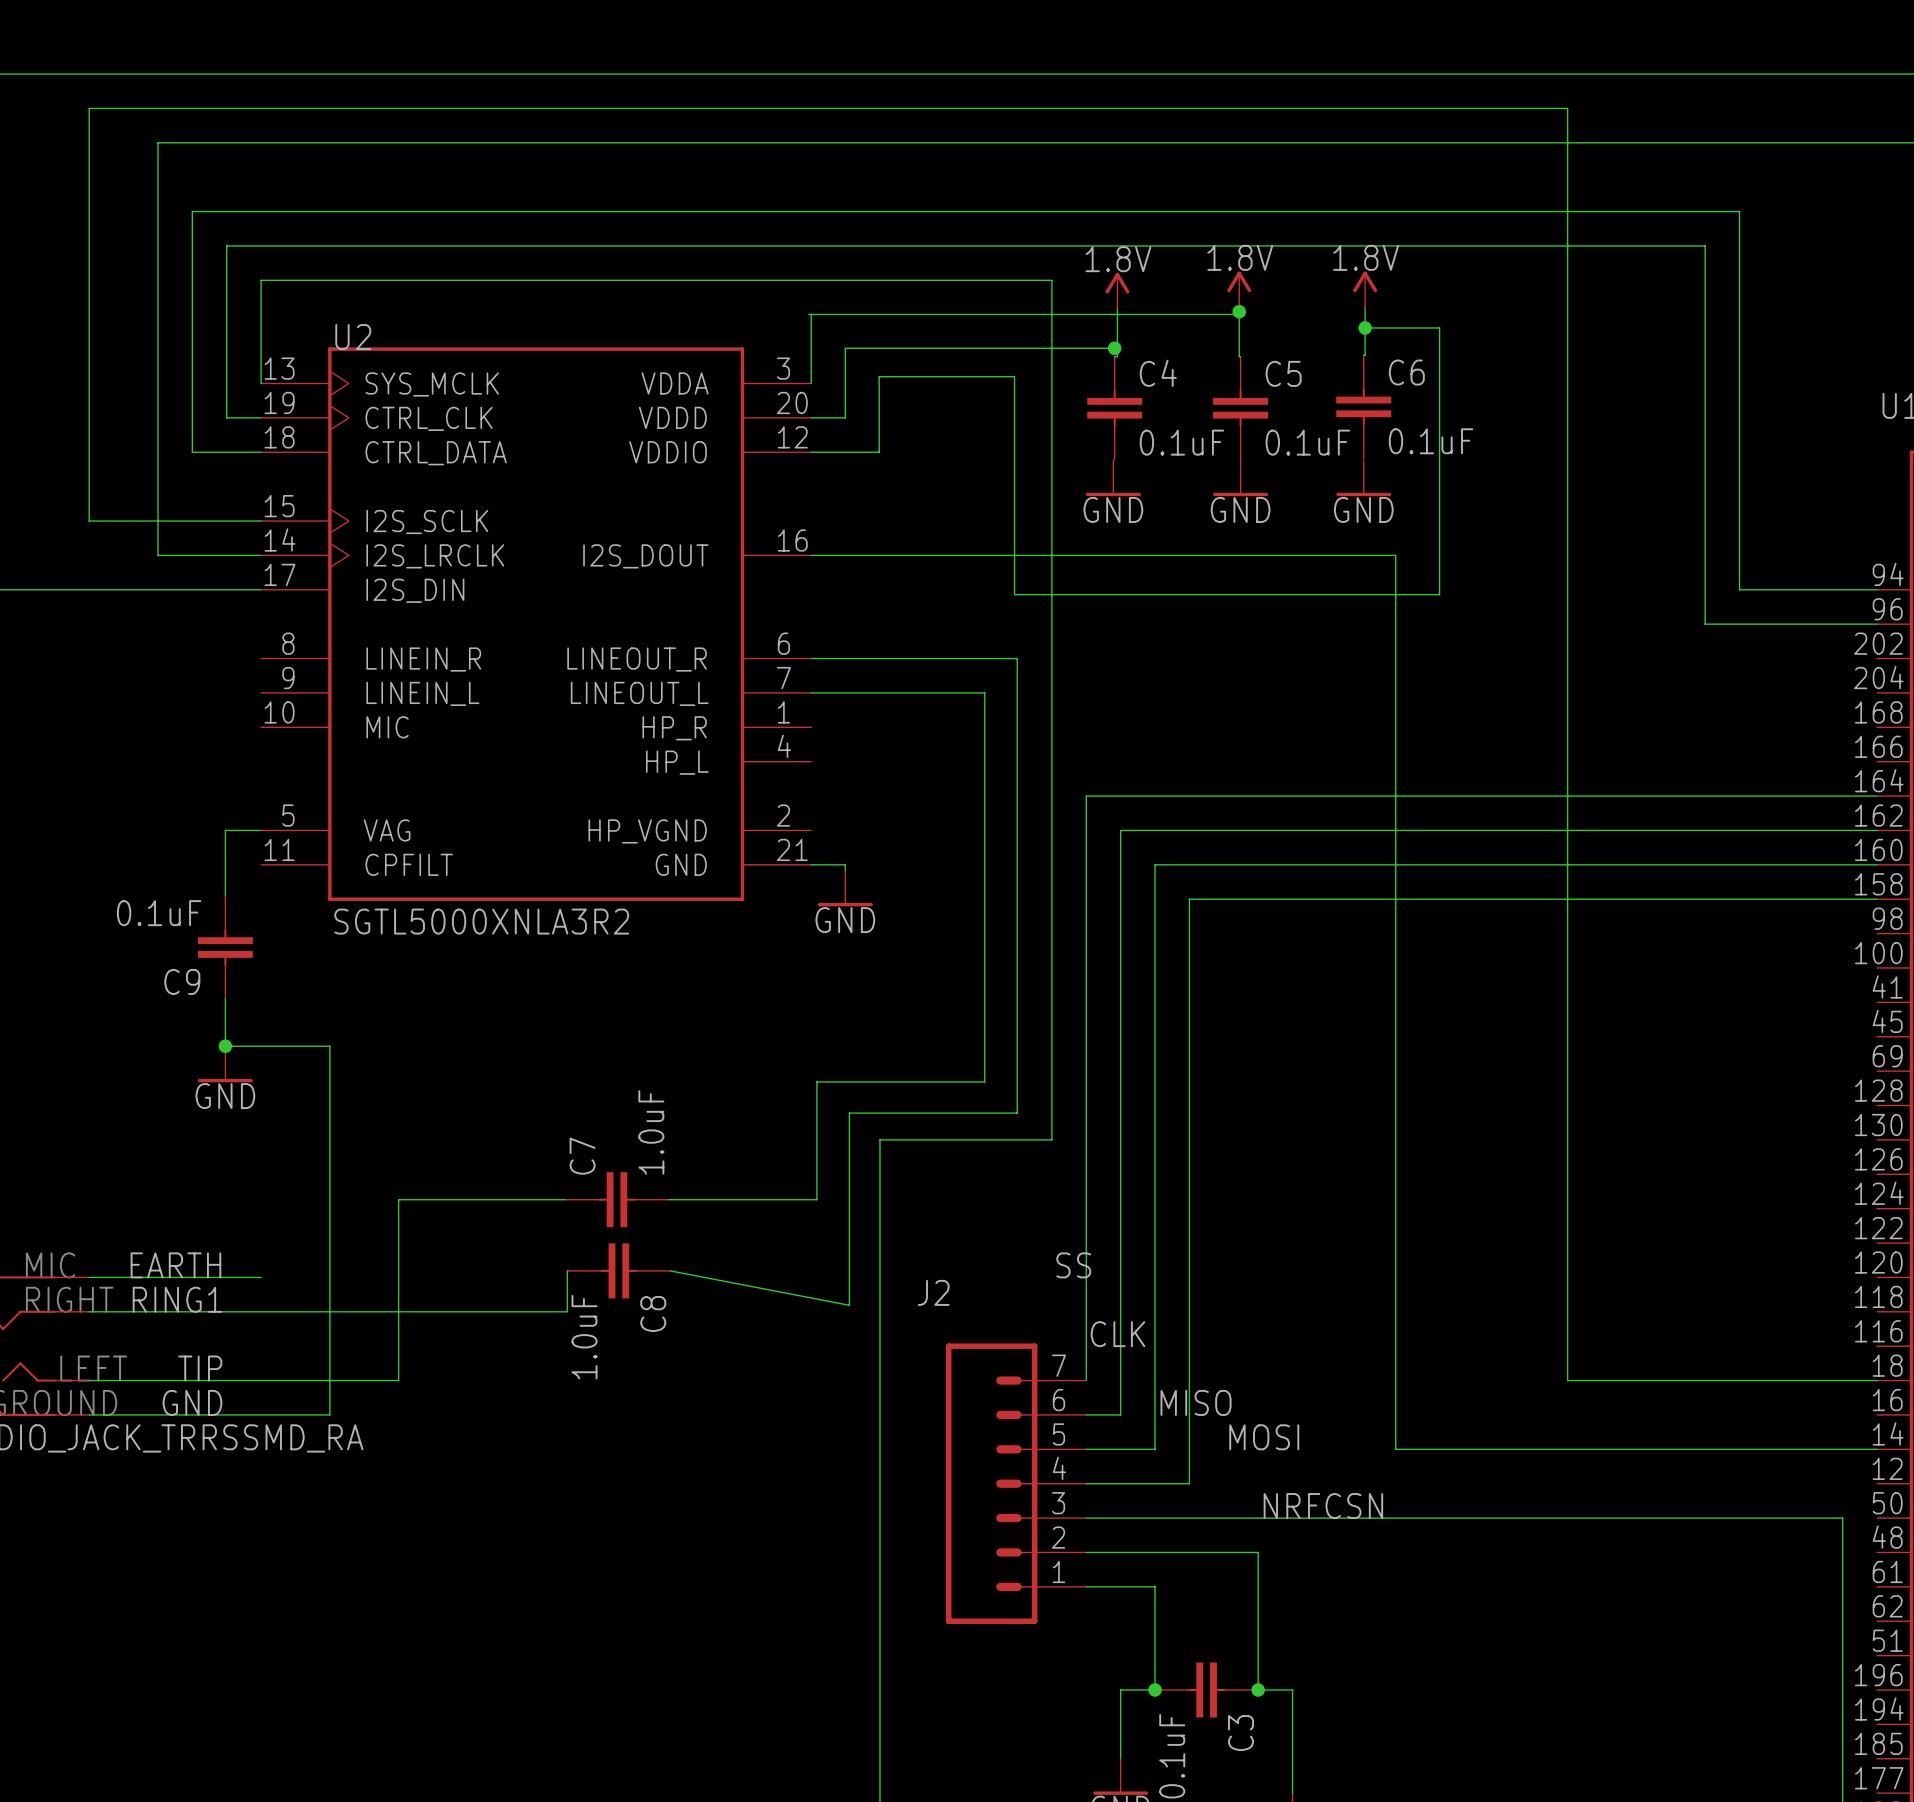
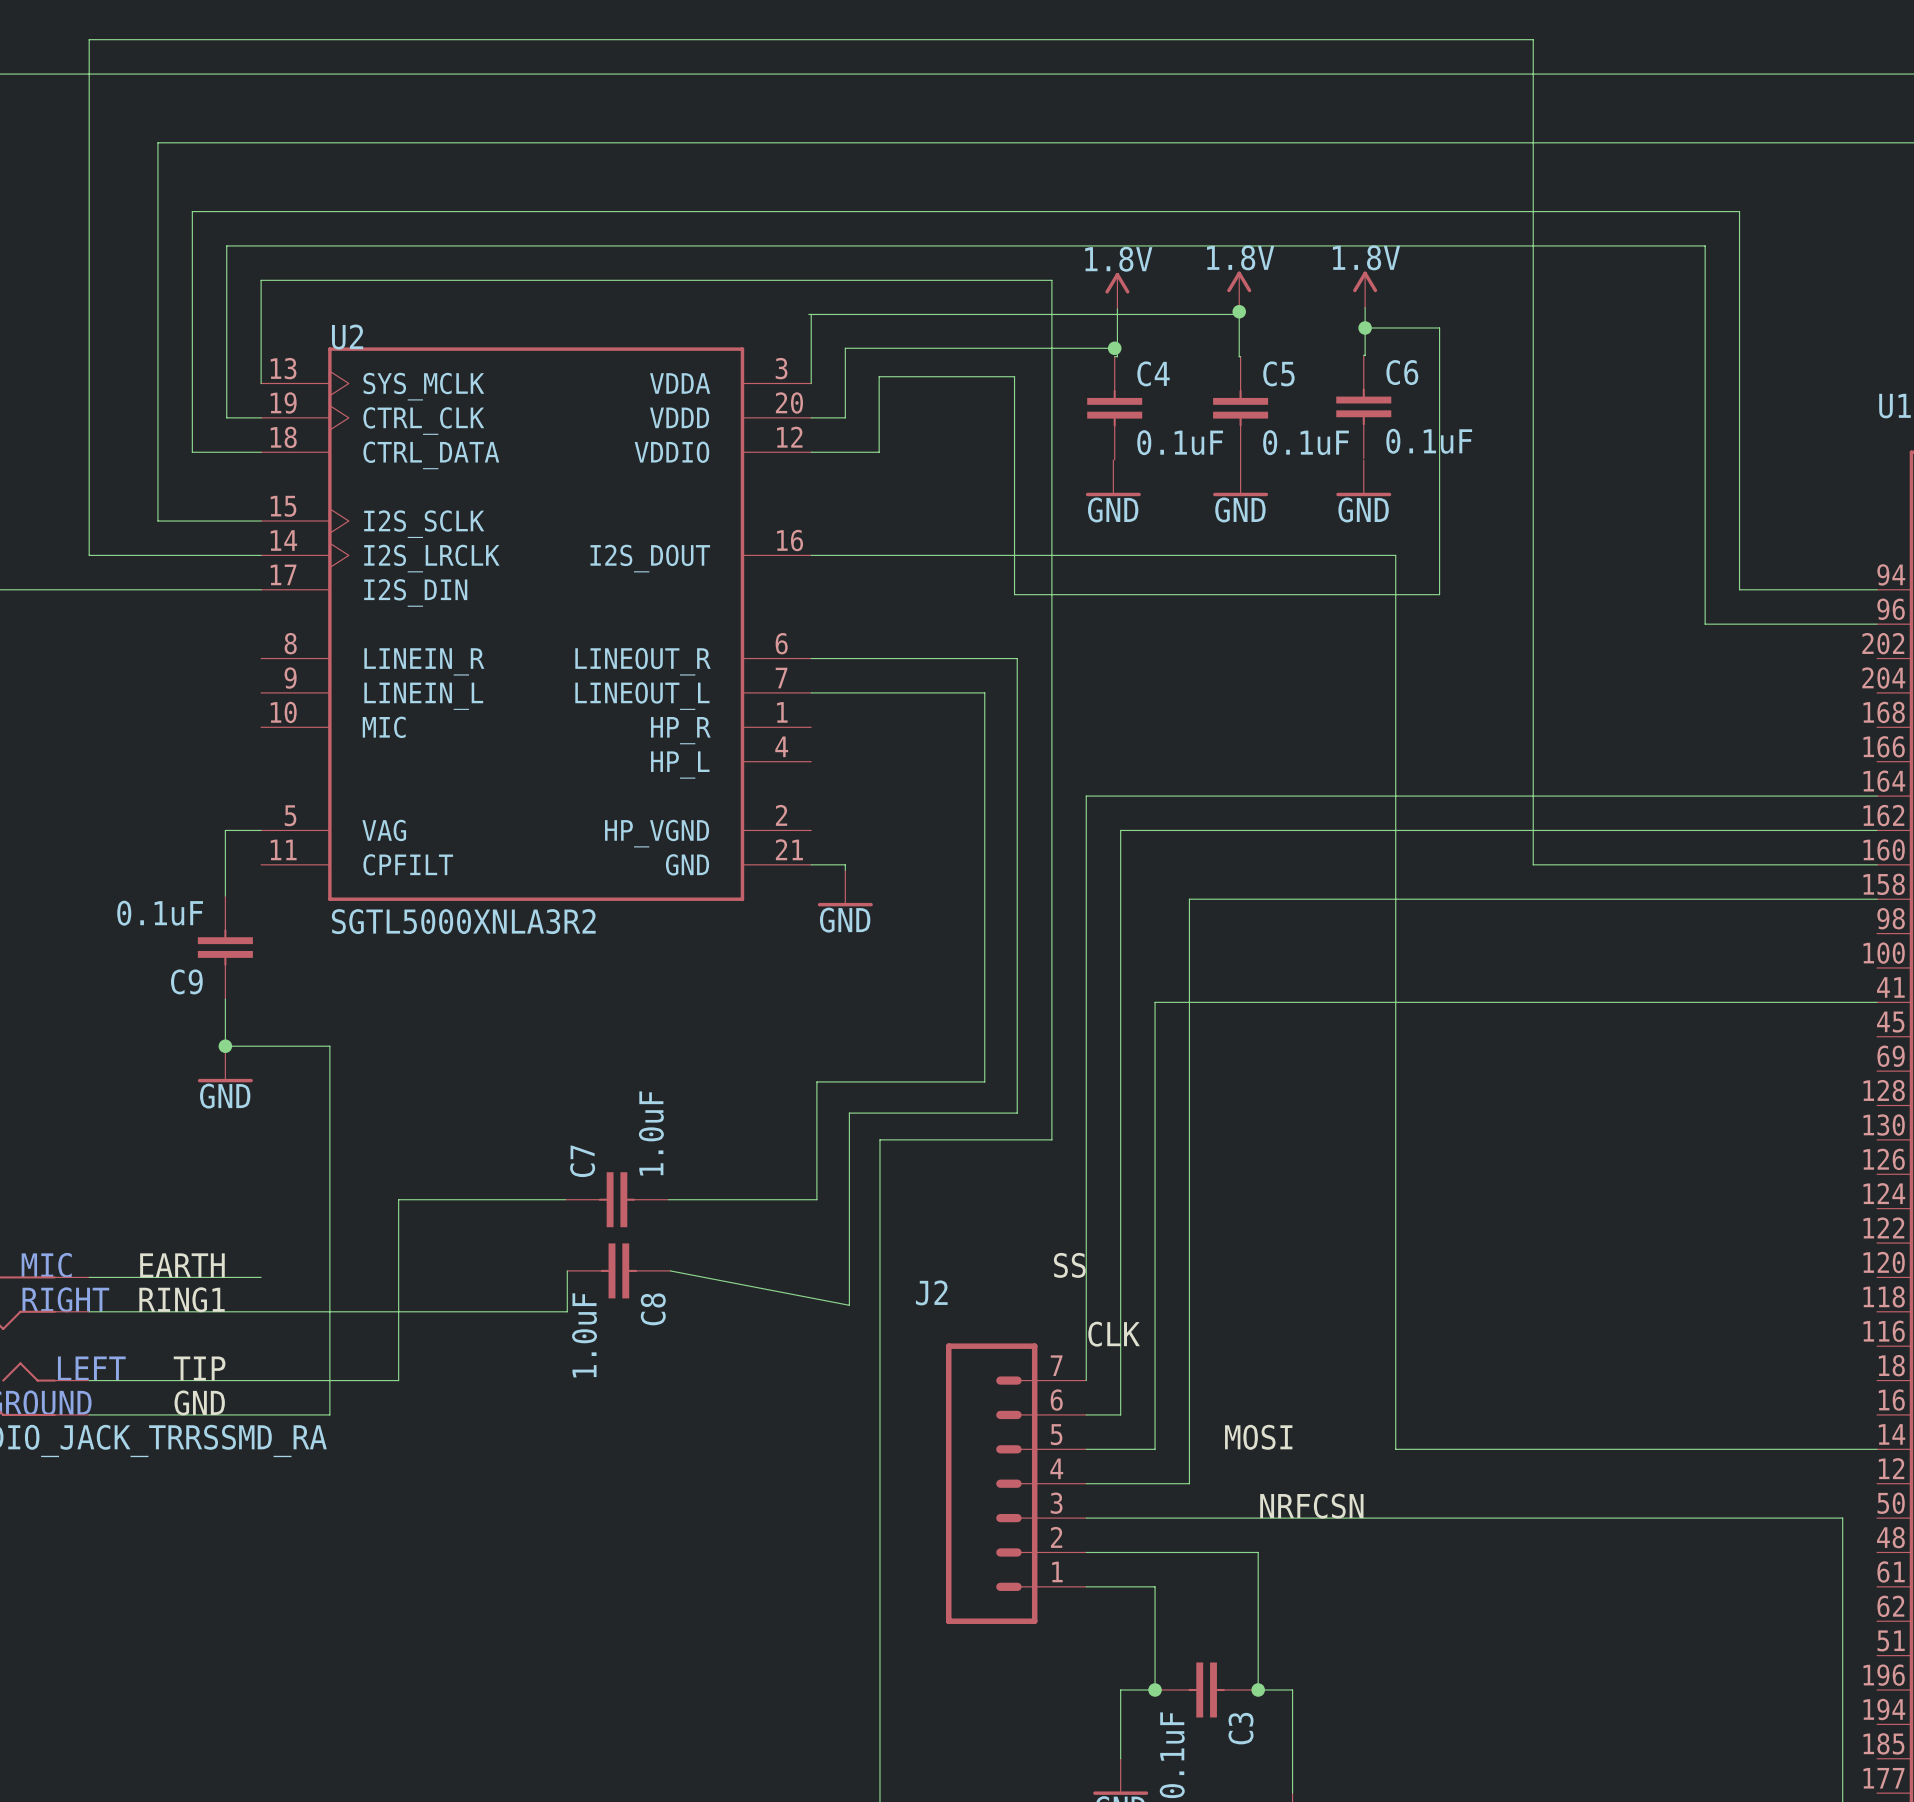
wire: (89, 108) (1567, 108) (1567, 1380) (1877, 1380) -> (89, 108) (89, 39) (1533, 39) (1533, 864)
wire: (89, 521) (157, 521) (157, 555) -> (89, 521) (89, 555) (157, 555)
wire: (1533, 864) (1155, 864) (1155, 1002) -> (1877, 1002) (1155, 1002)
label: MISO (1196, 1402) -> none

